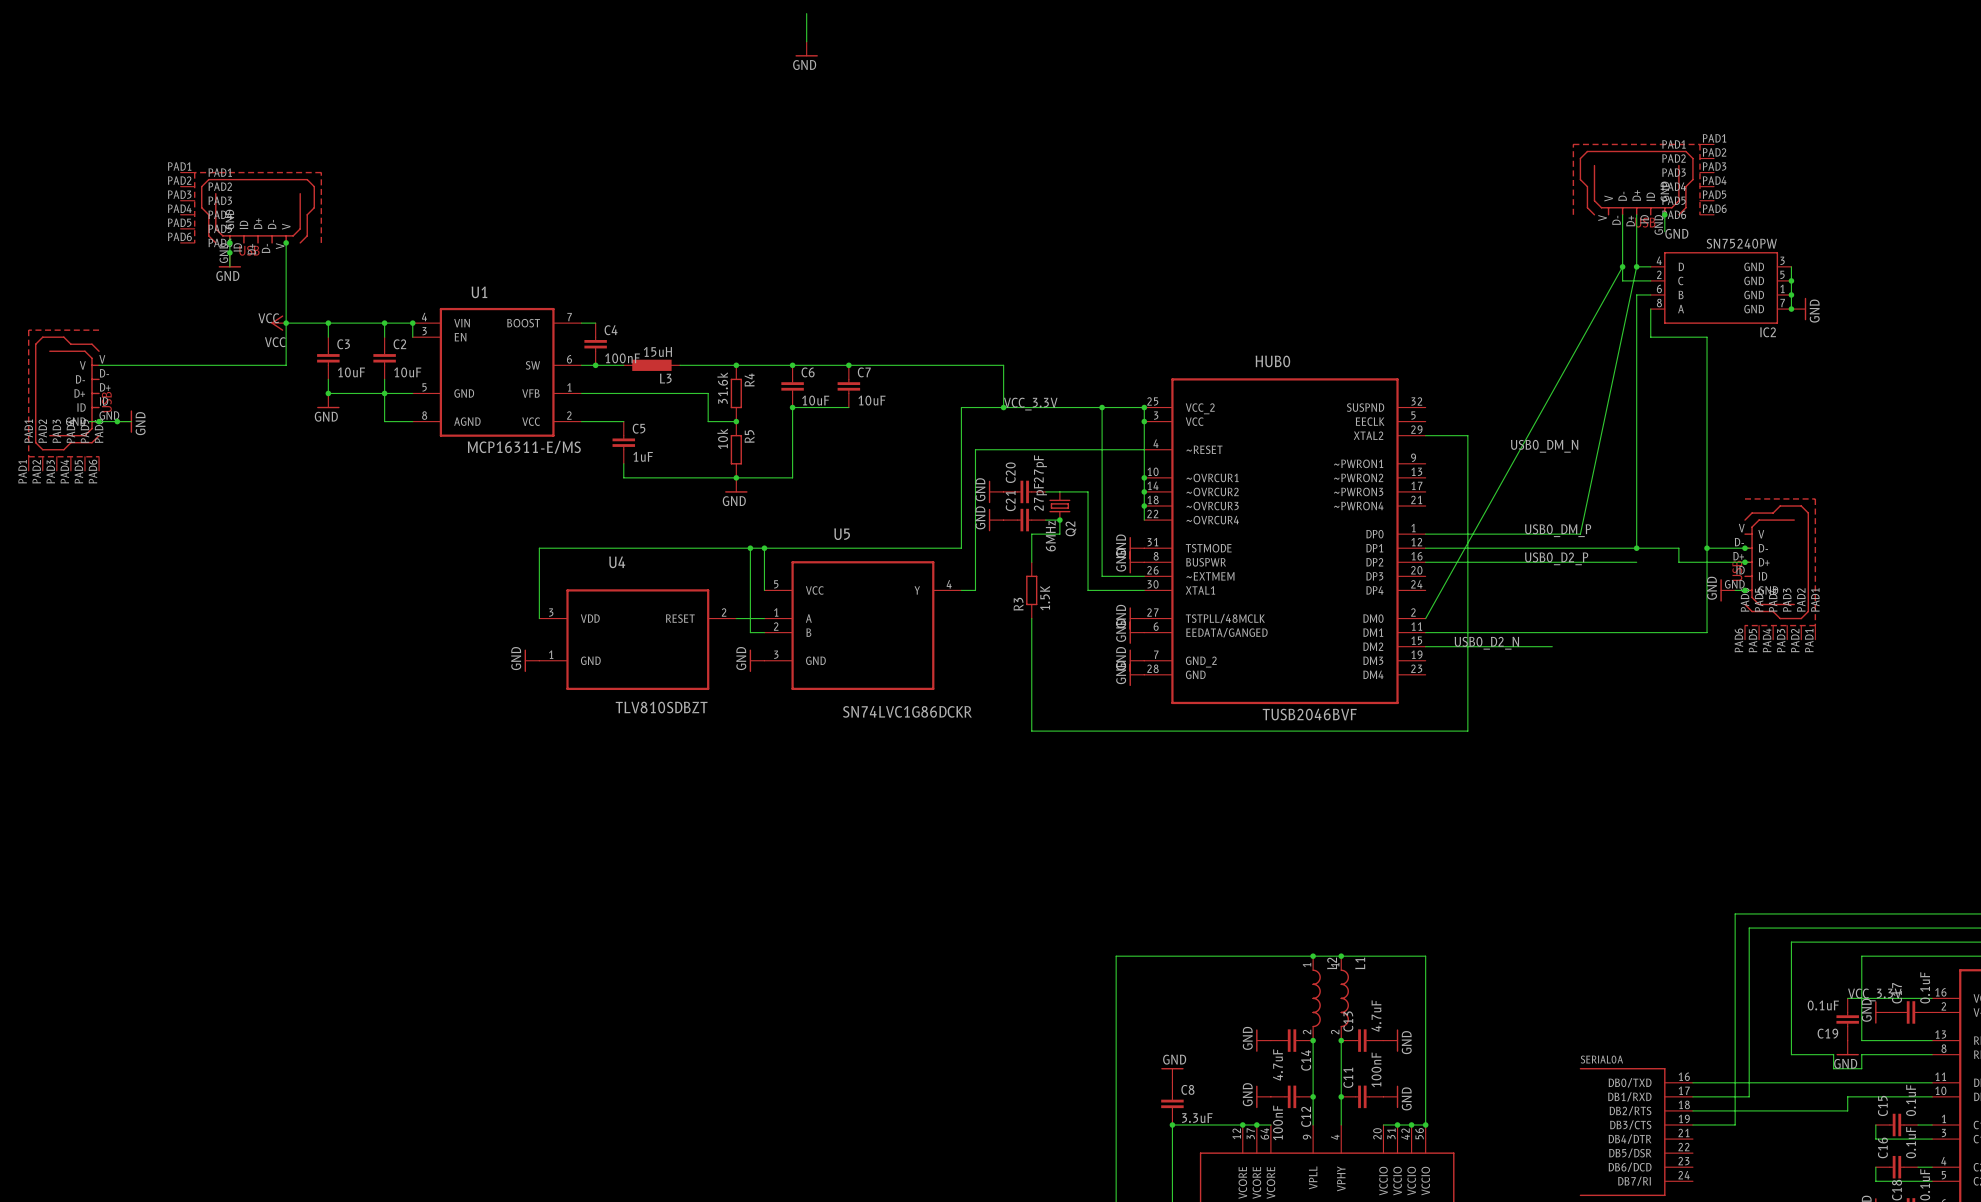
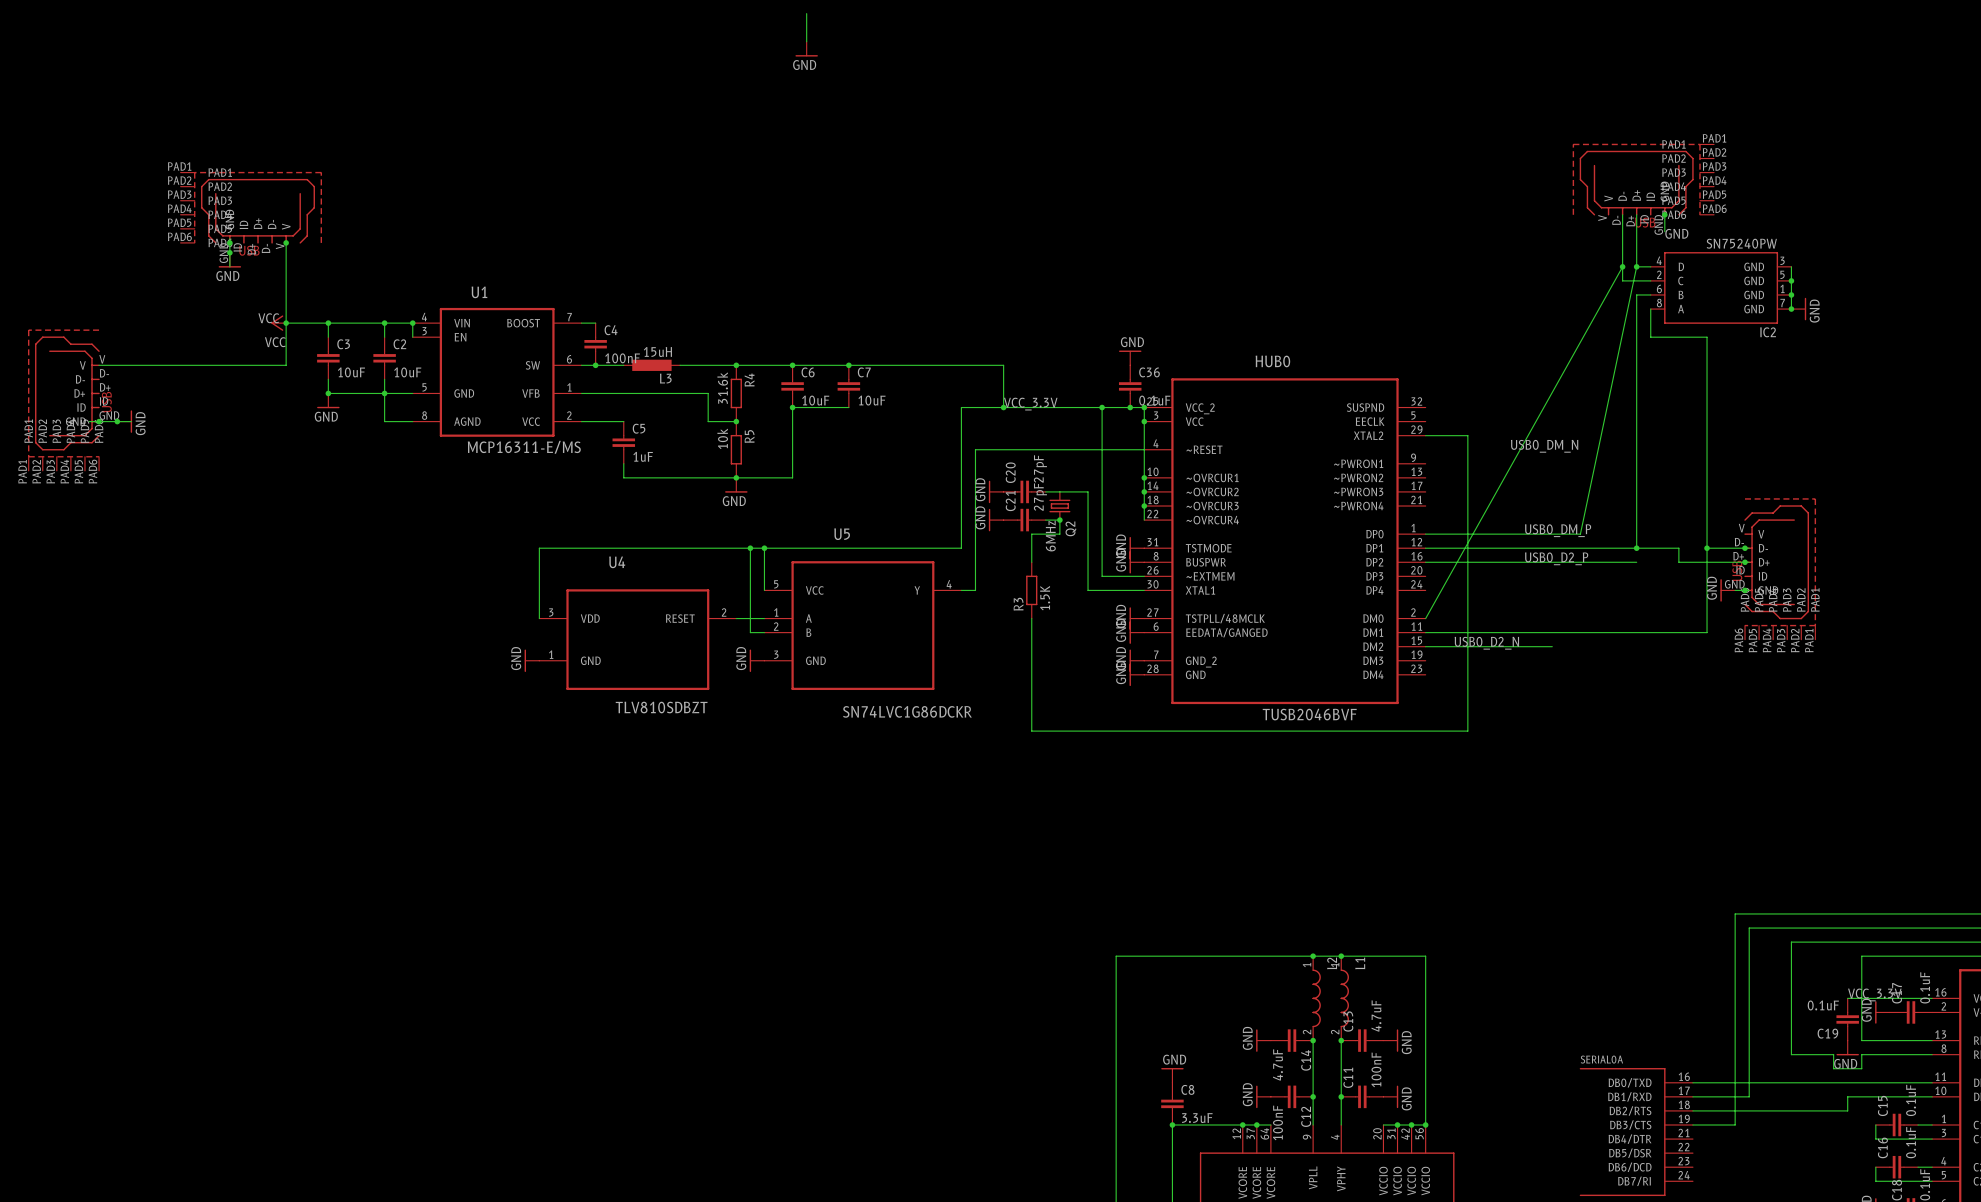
power symbol: none -> GND (1130, 357)
C36: none -> 0.1uF (1130, 386)
junction: none -> (1130, 407)

